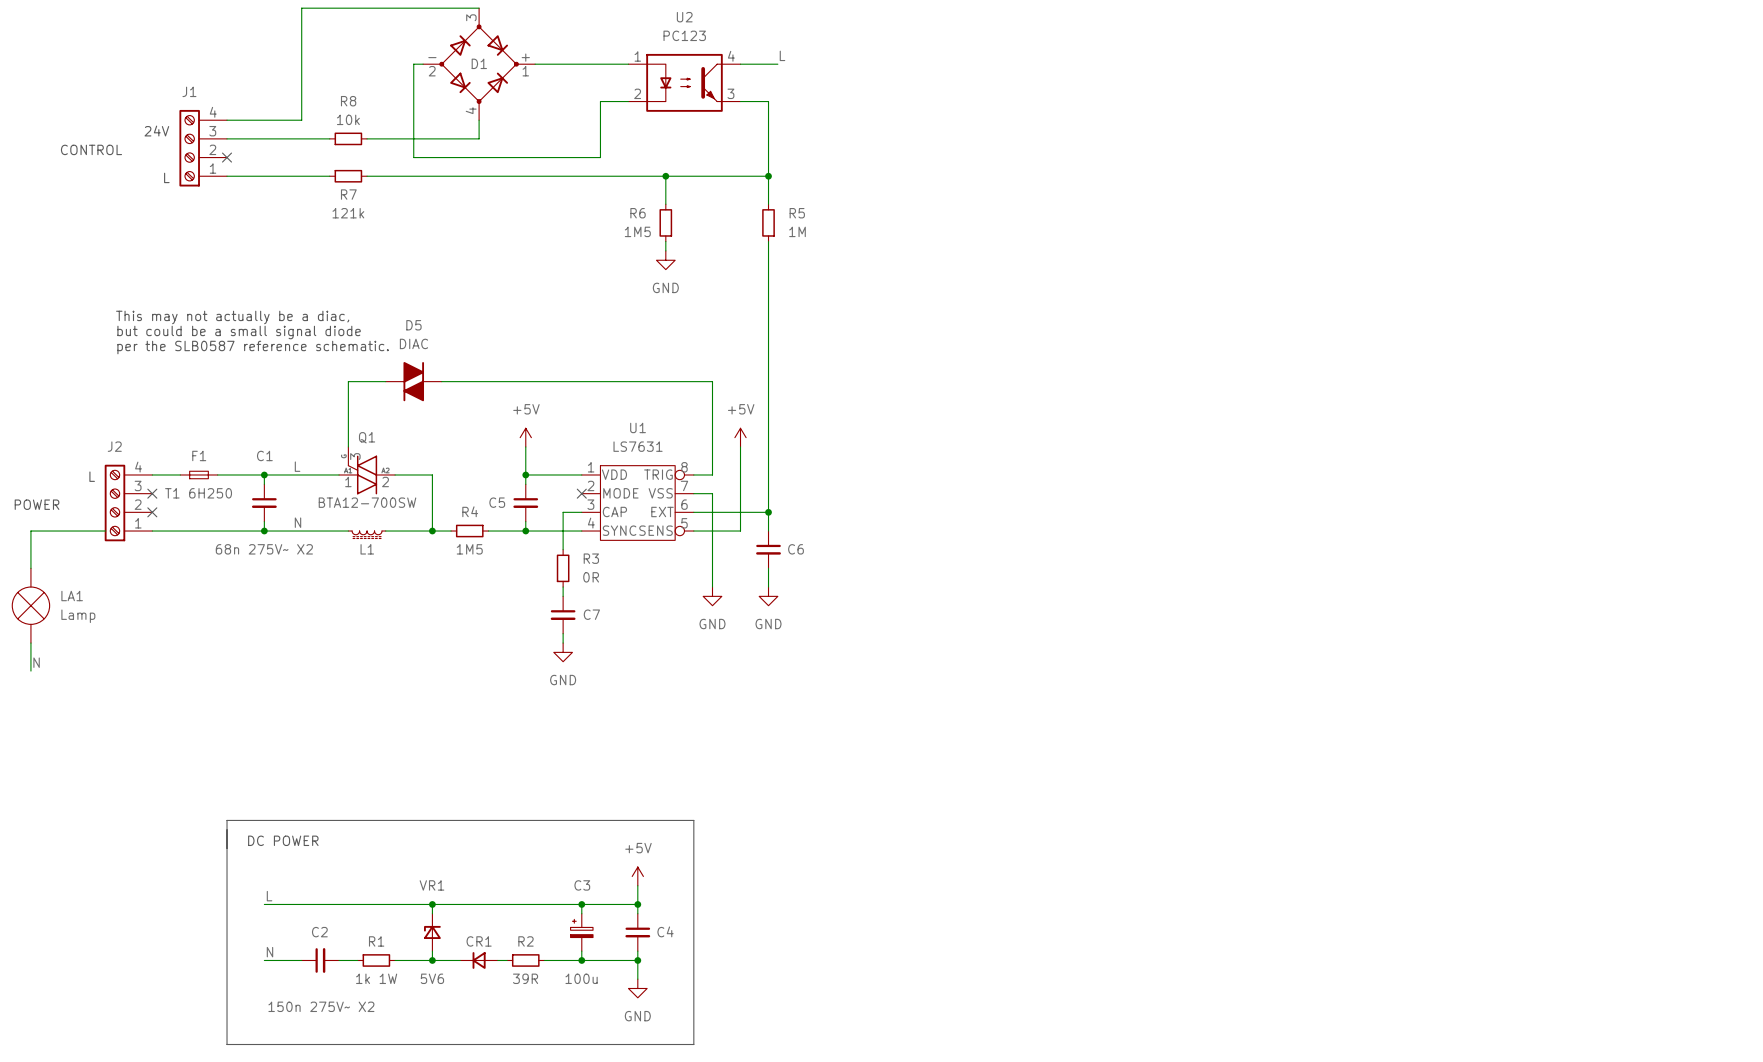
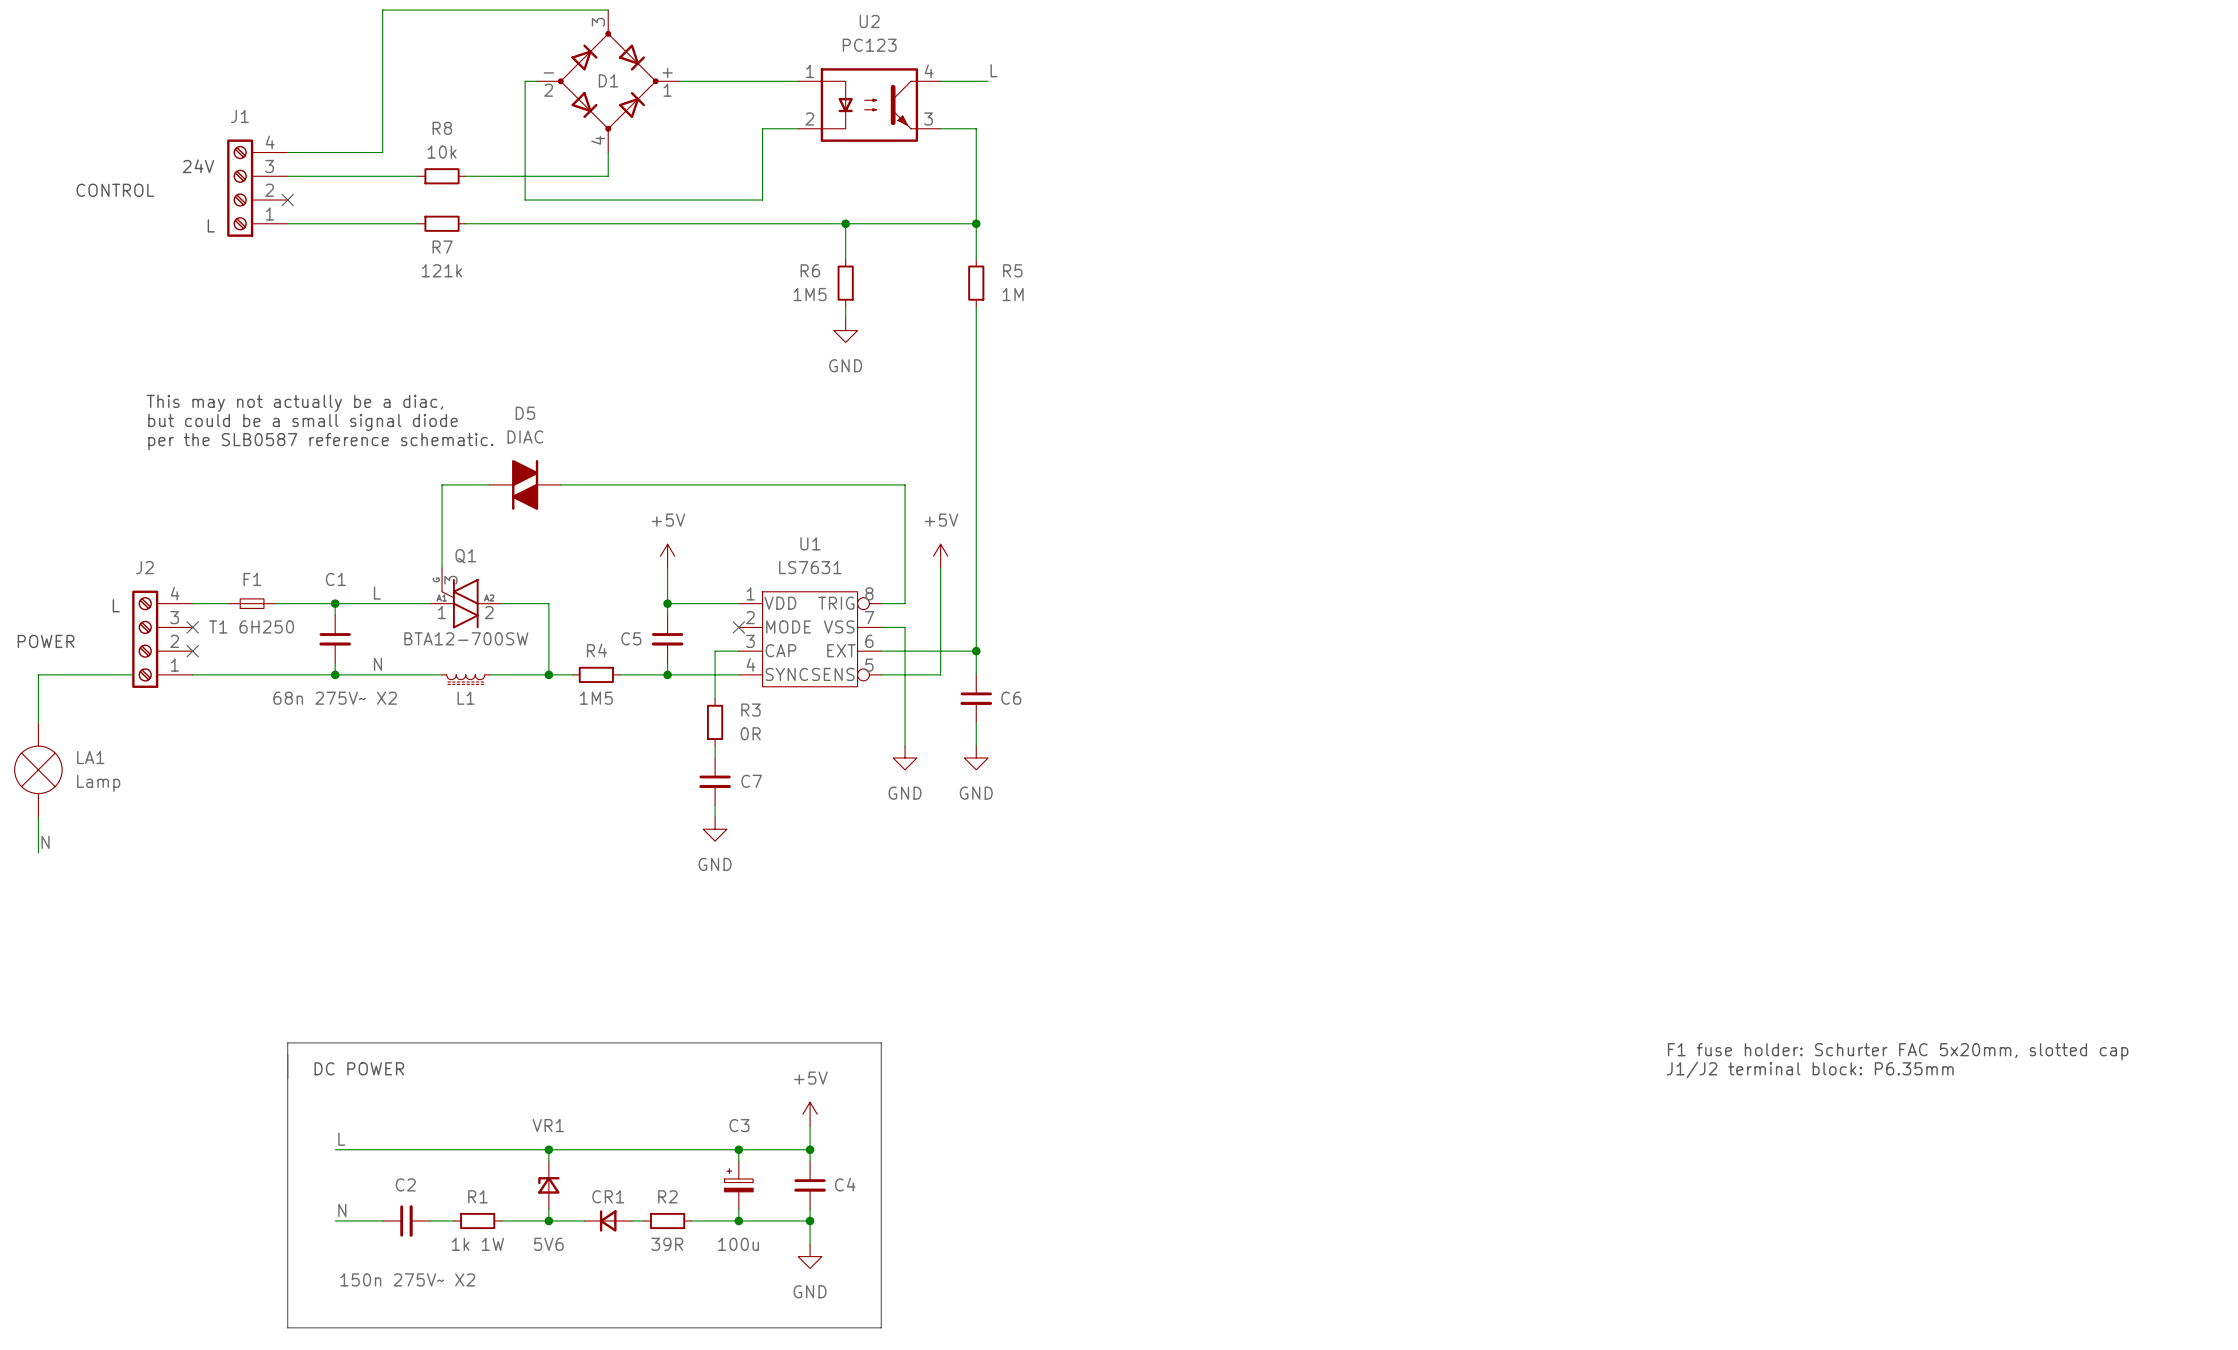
text: none -> F1 fuse holder: Schurter FAC 5x20mm, slotted cap (1898, 1051)
text: none -> J1/J2 terminal block: P6.35mm (1810, 1069)

